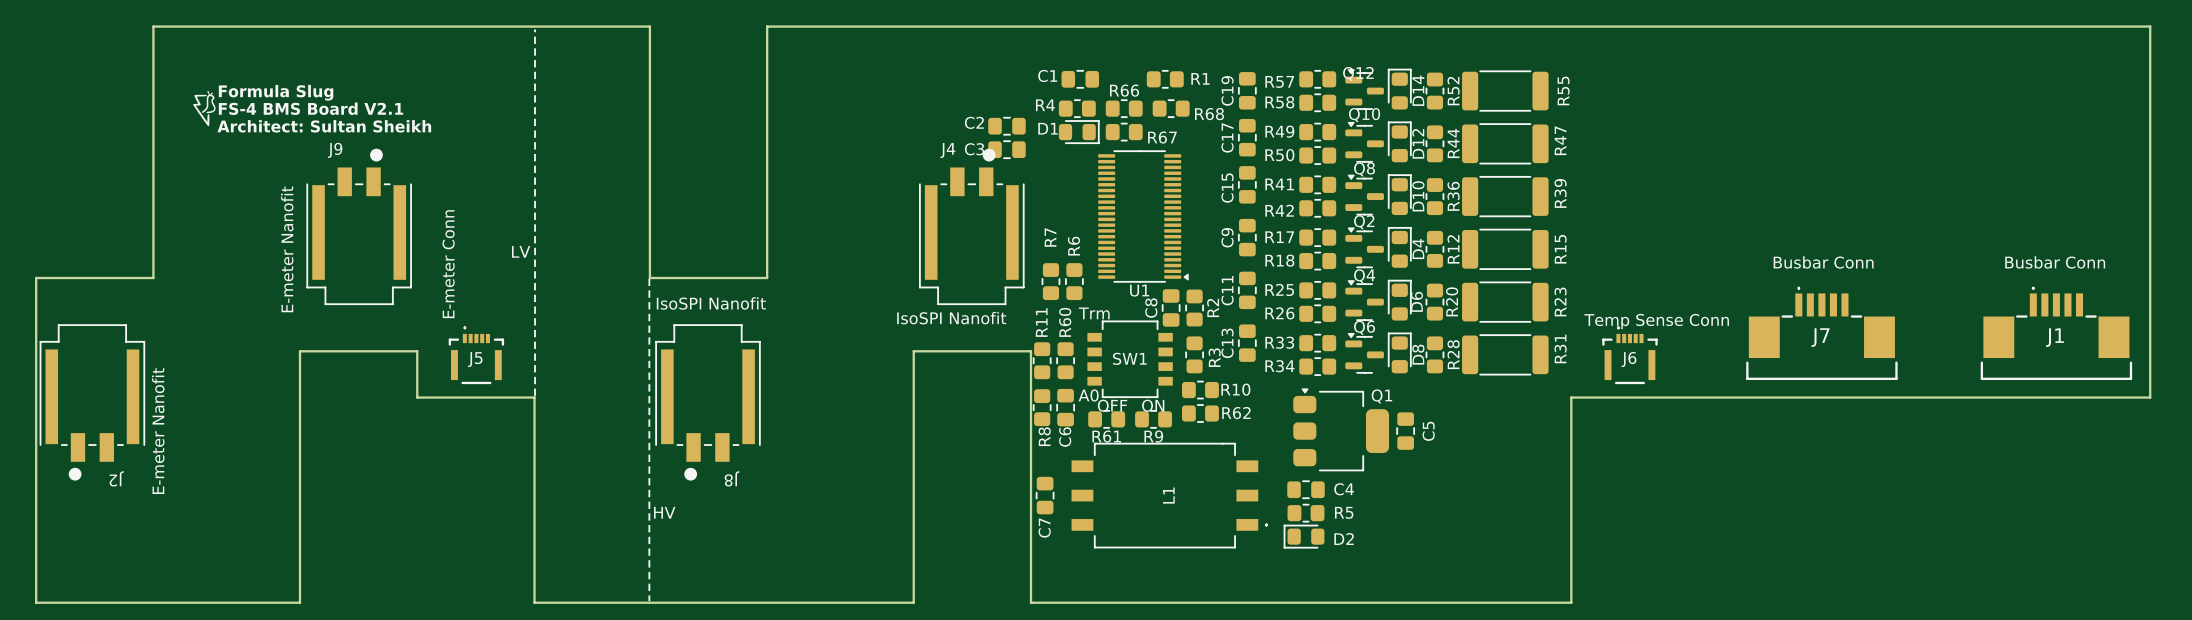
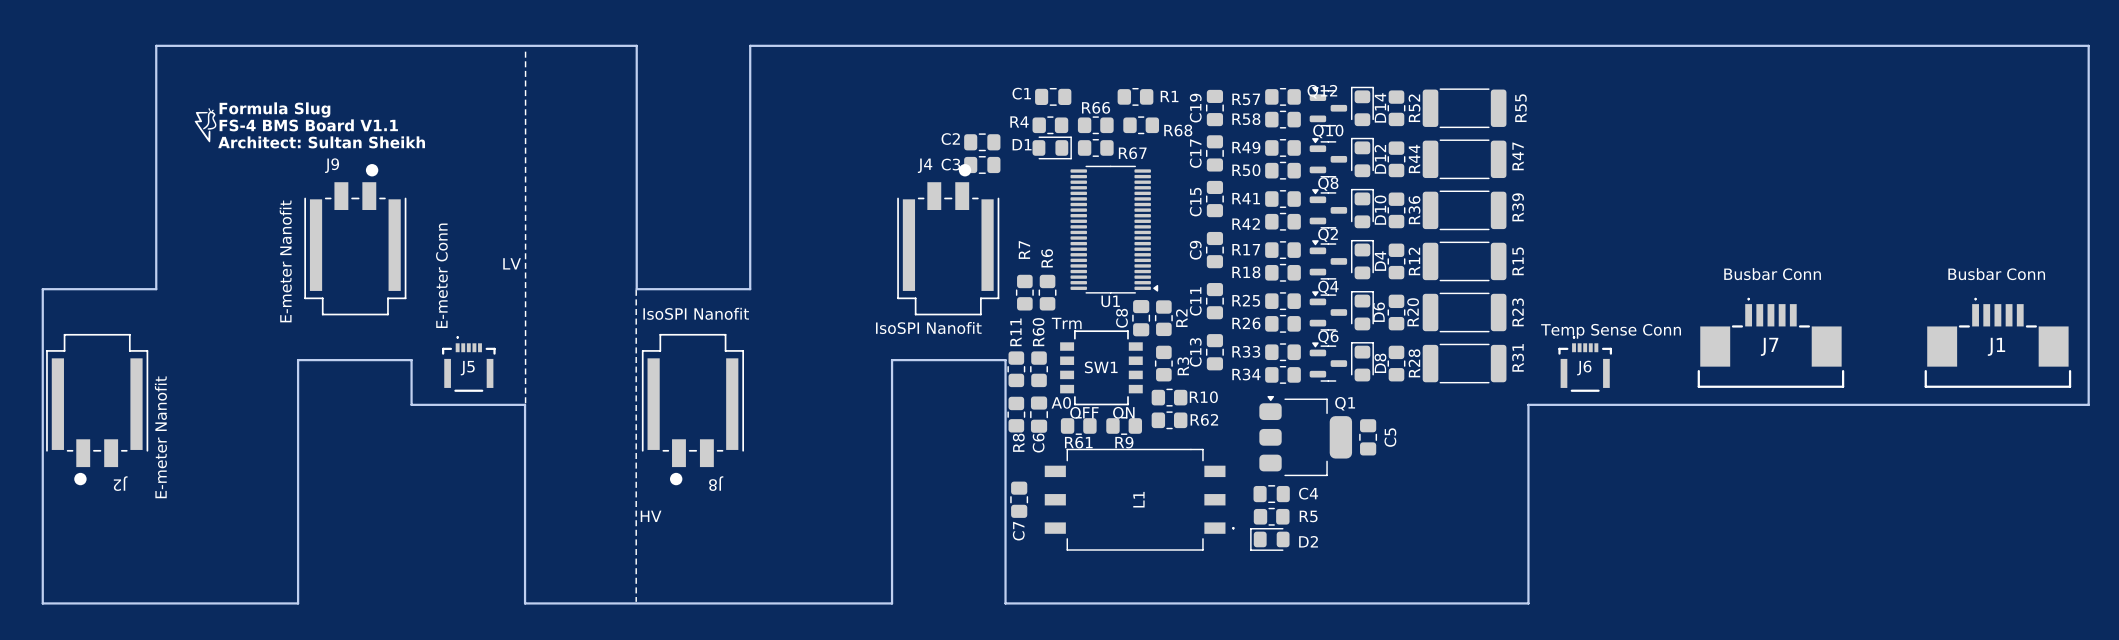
drawing shape: [193, 84, 432, 133] -> [194, 102, 426, 149]

